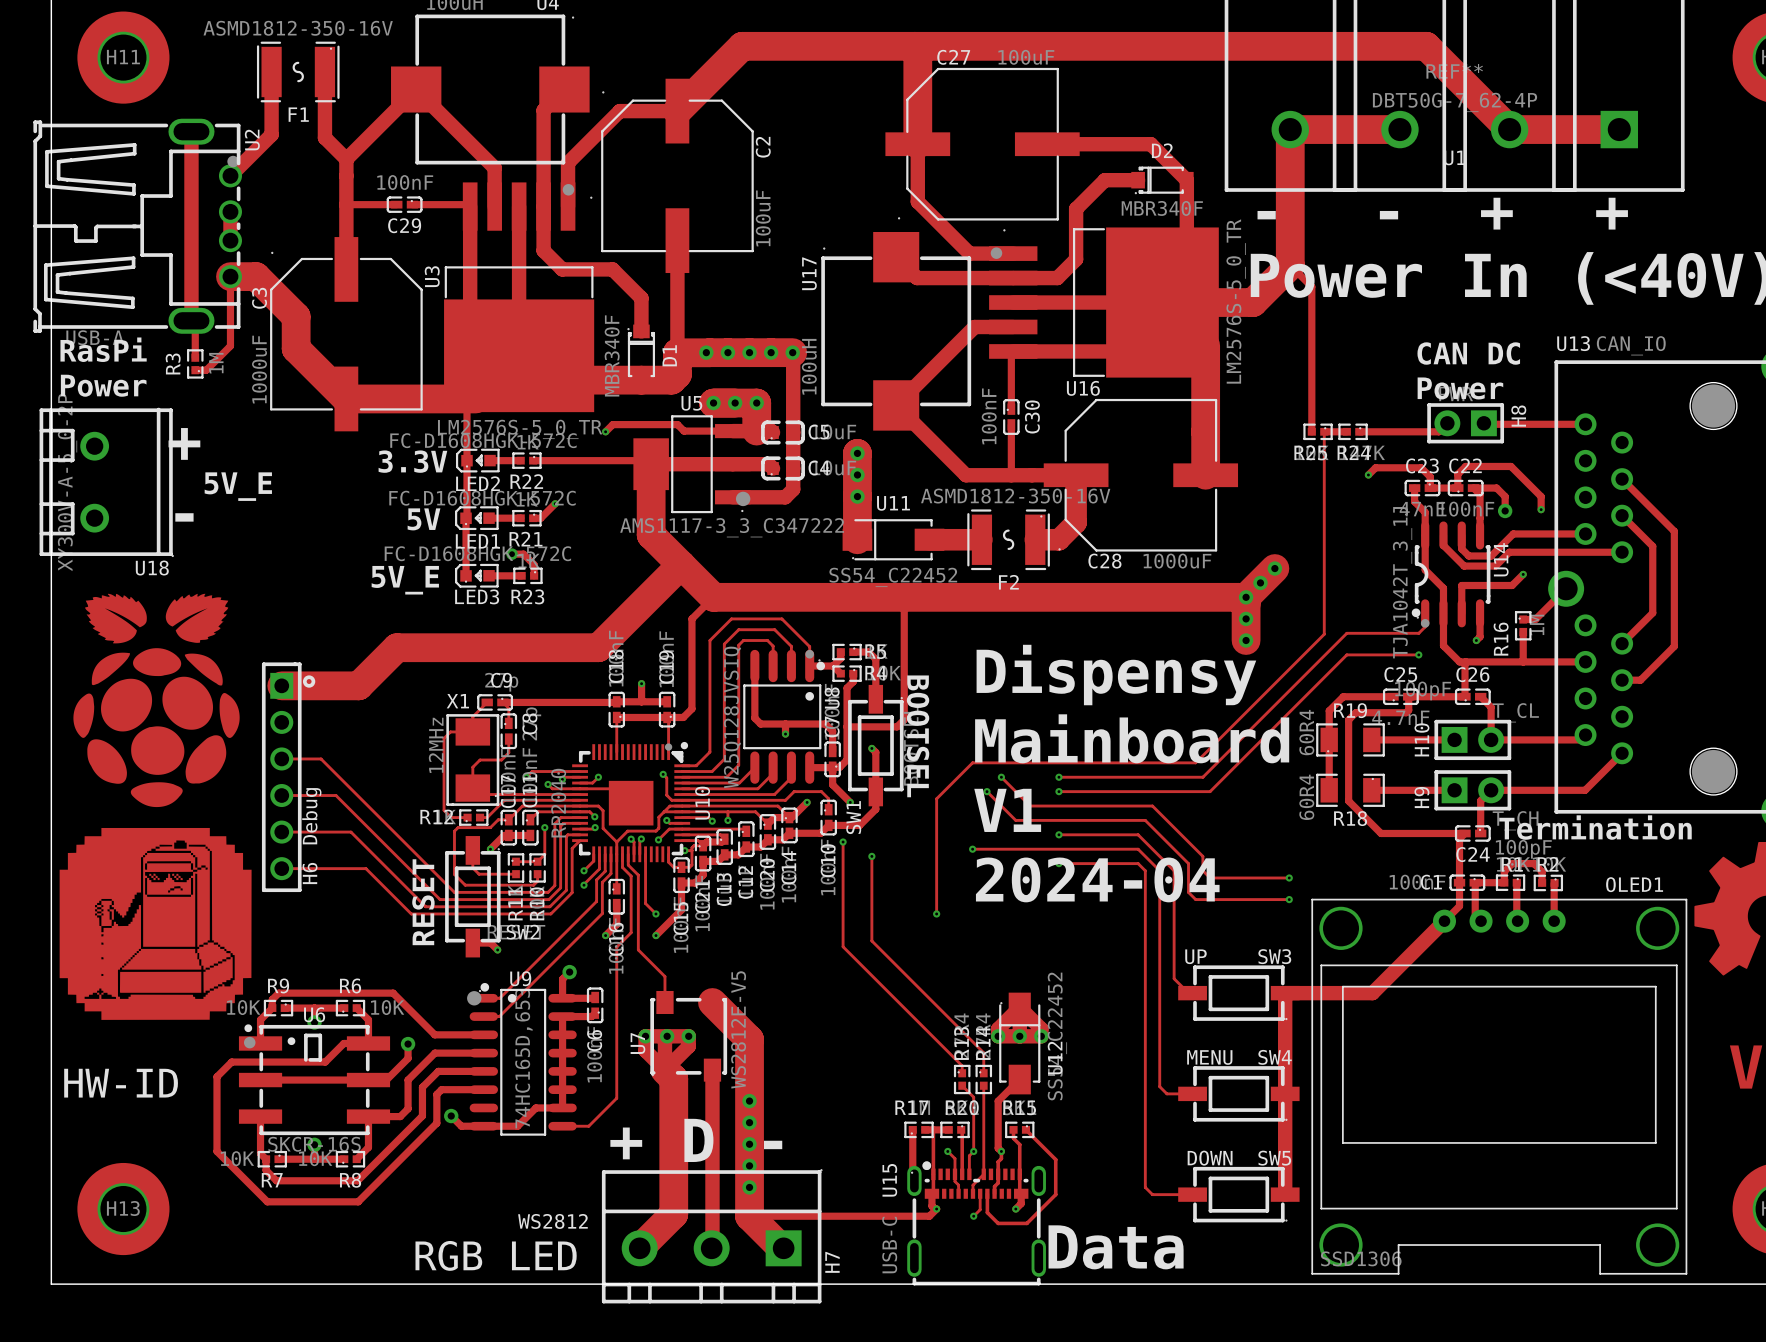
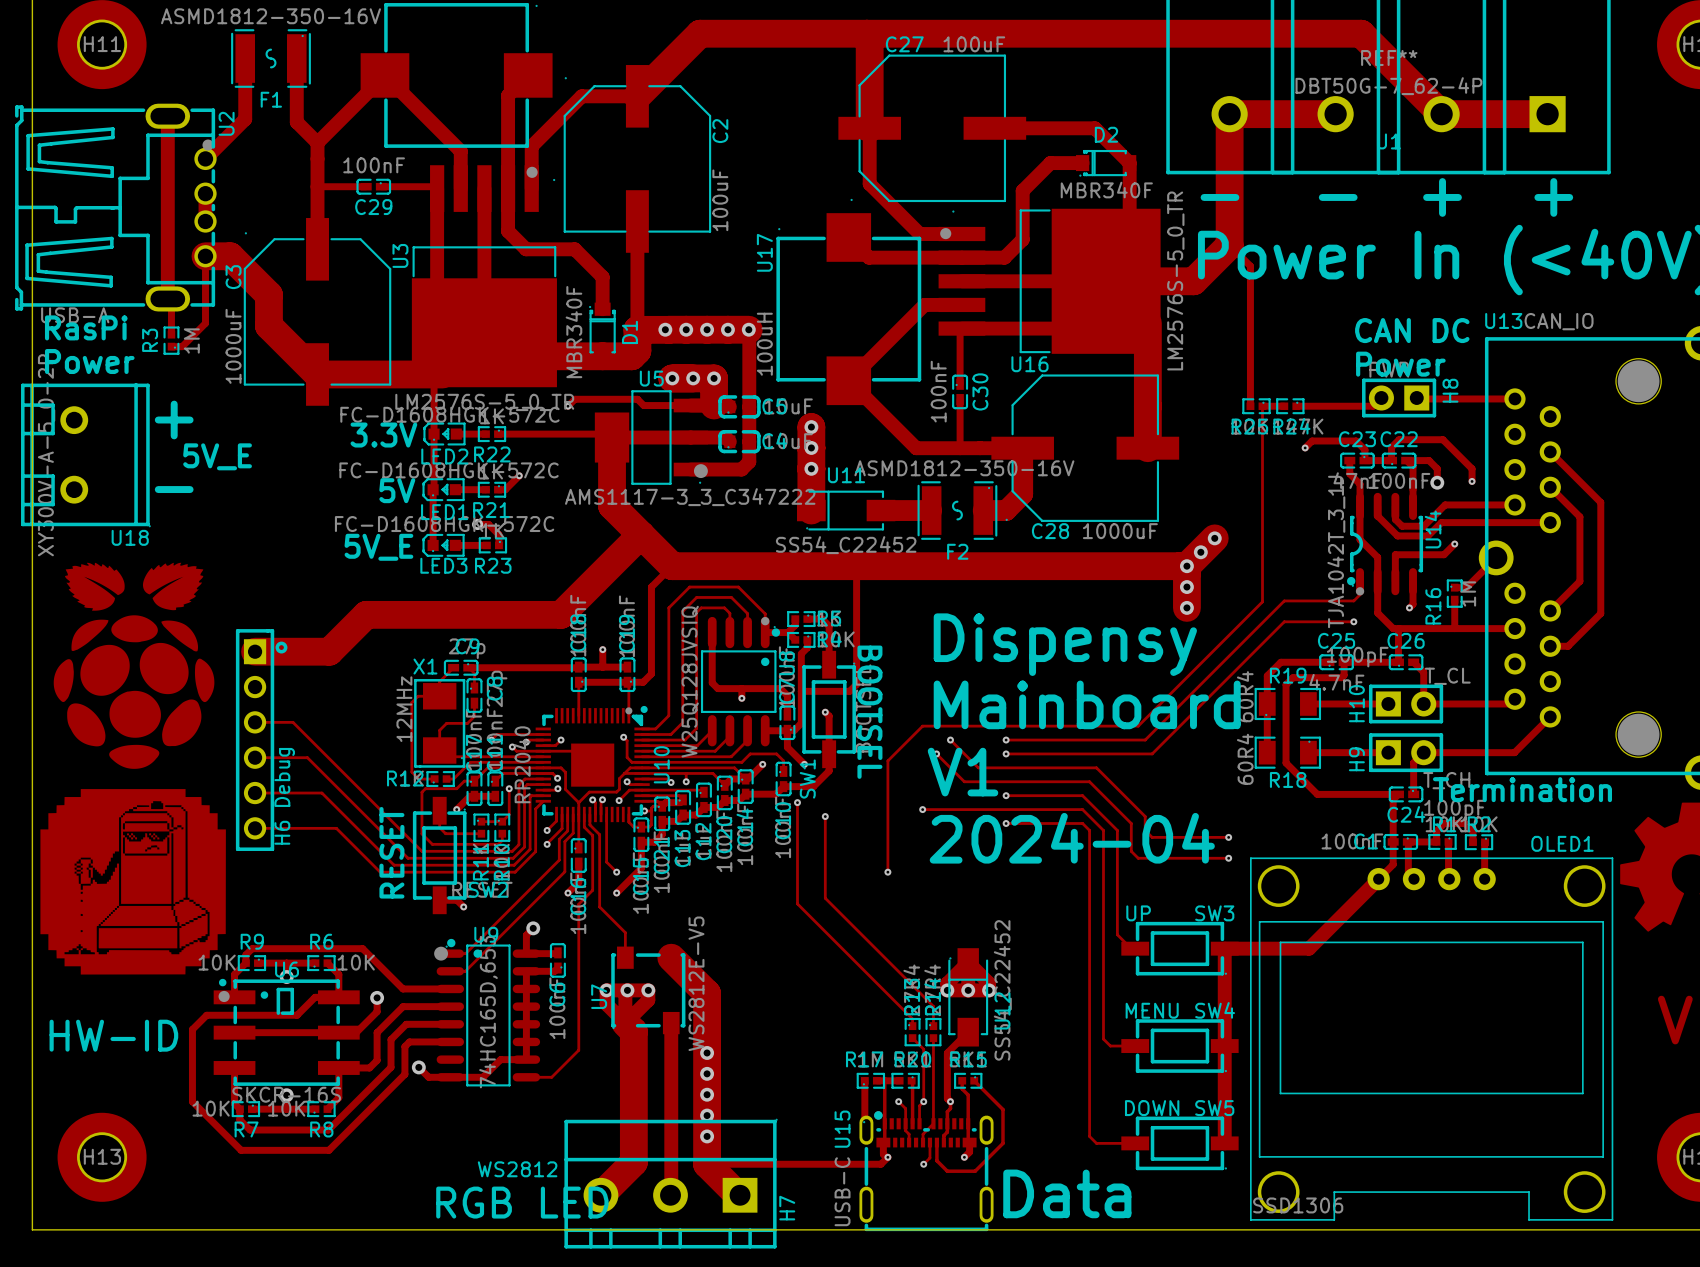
text: D (698, 1140) -> none
text: + (626, 1143) -> none
text: - (773, 1144) -> none
text position: RGB LED (496, 1255) -> RGB LED (522, 1202)

